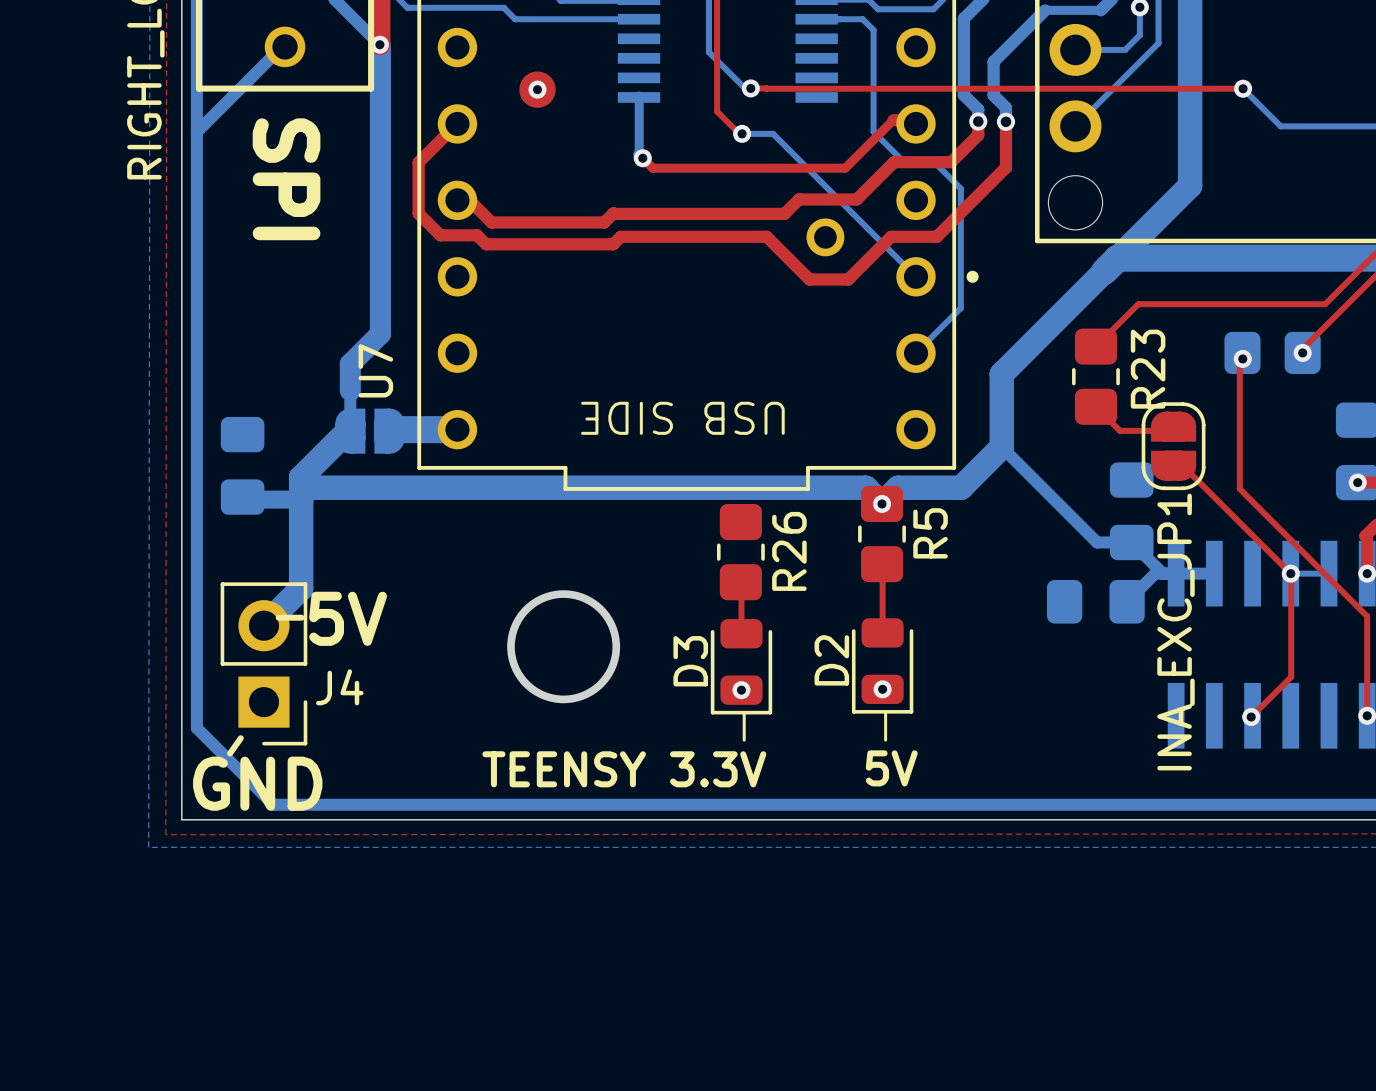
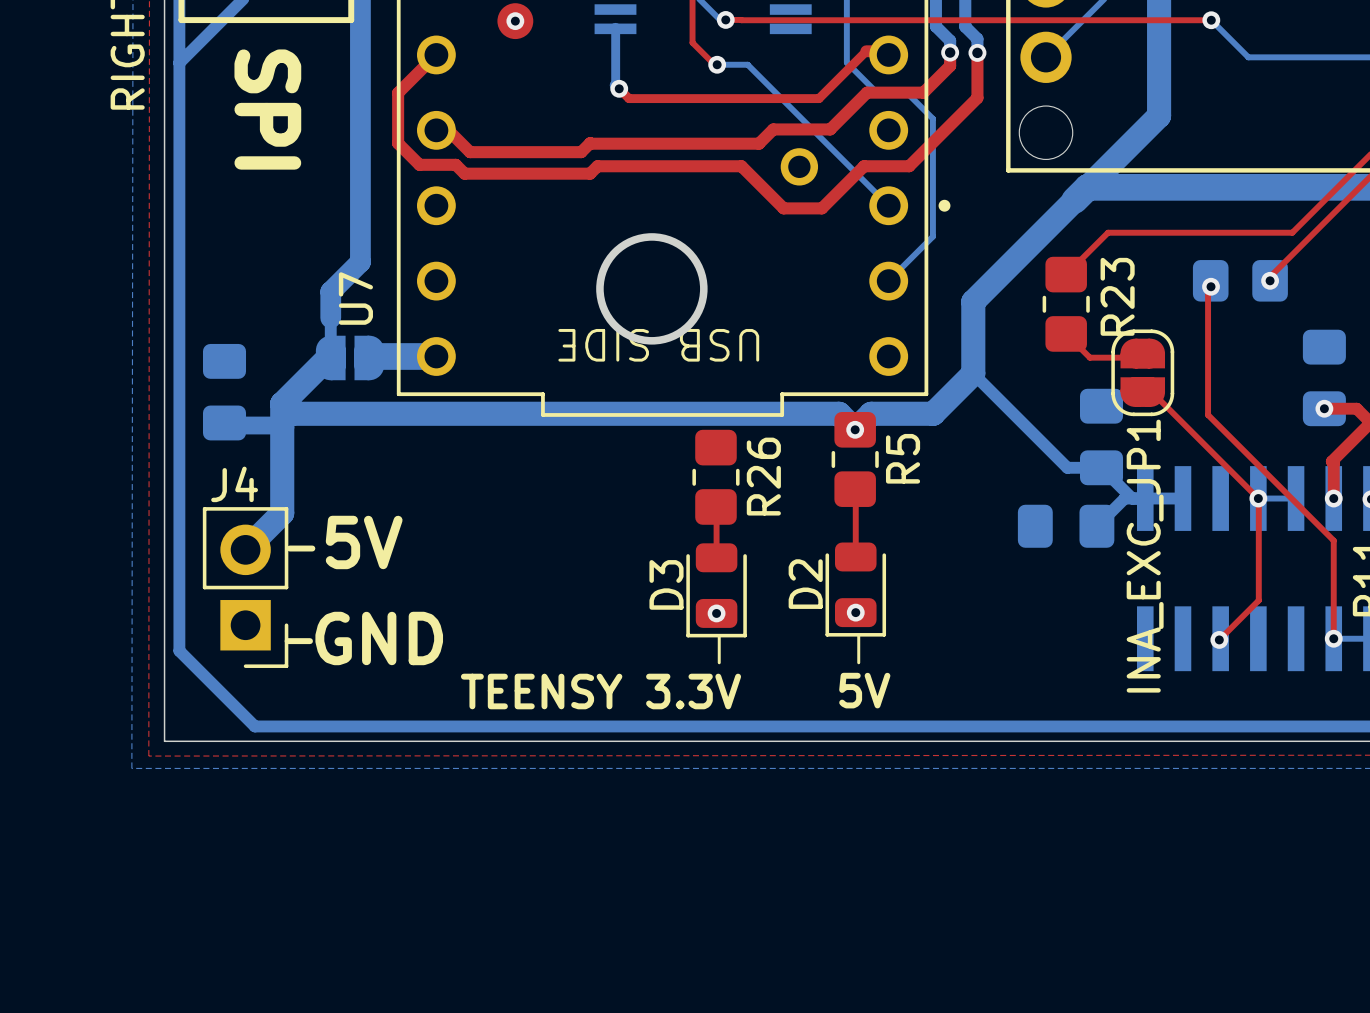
line: (278, 617) (301, 617) -> (289, 548) (312, 548)
text position: 5V (348, 618) -> 5V (364, 542)
round board edge position: (563, 646) -> (651, 288)
J4 name position: J4 (339, 687) -> J4 (234, 484)
line: none -> (287, 641) (309, 641)
line: (240, 738) (229, 753) -> none
text position: GND (257, 783) -> GND (379, 638)

